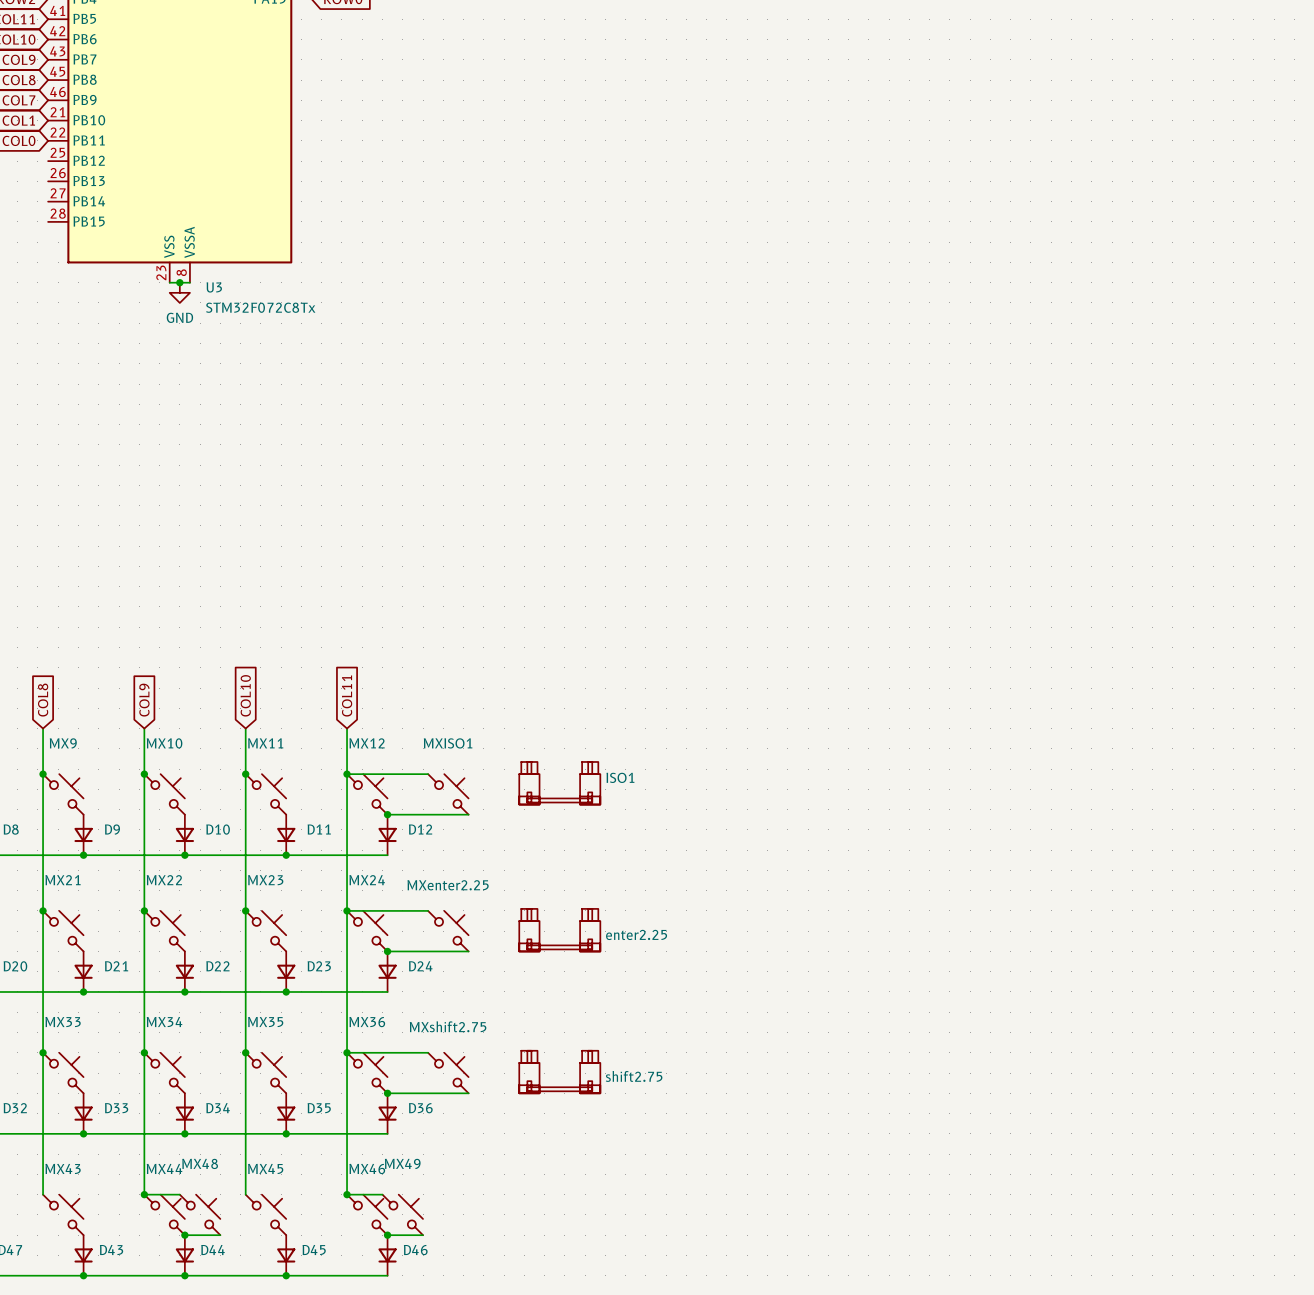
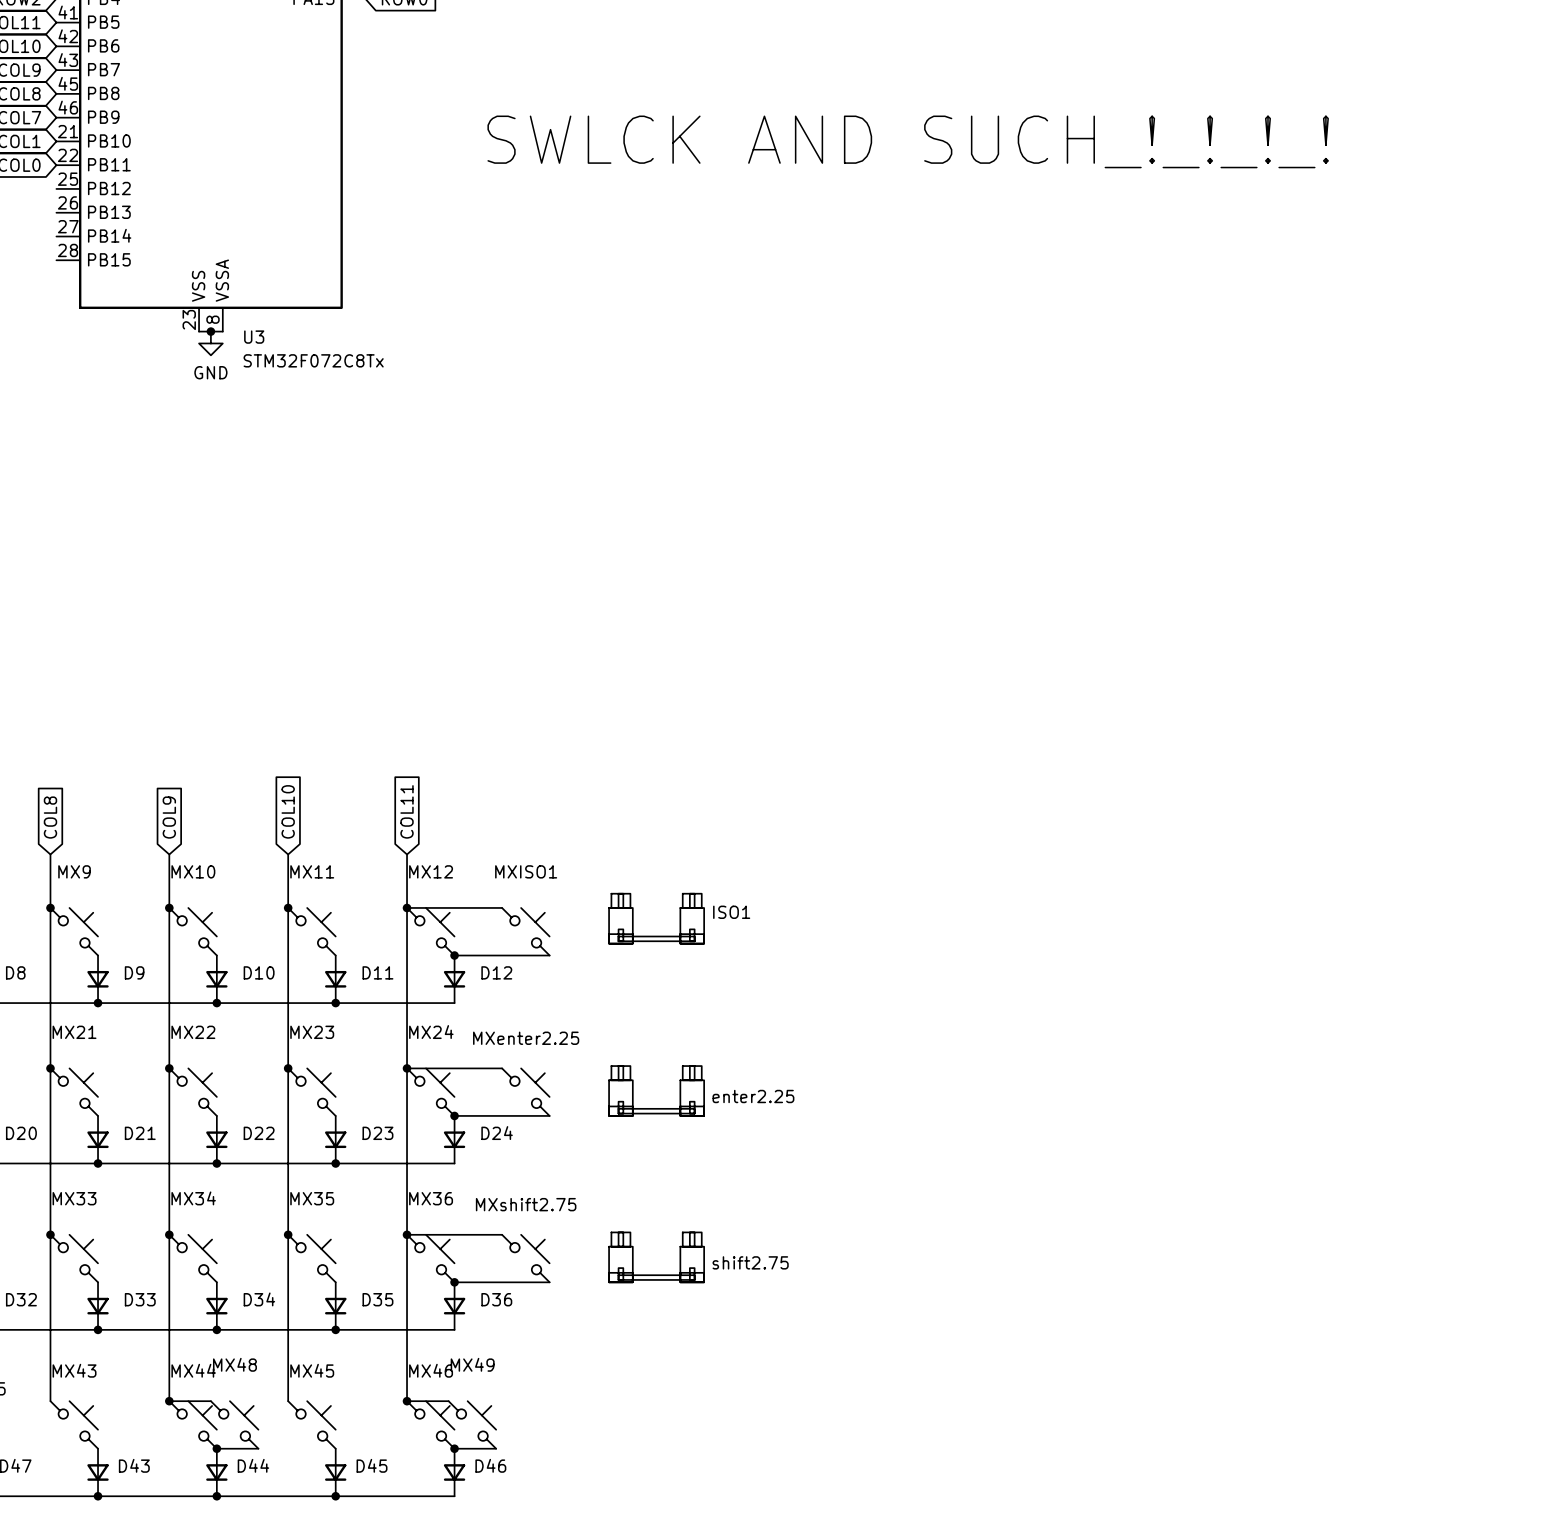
text: none -> SWLCK AND SUCH_!_!_!_! (908, 141)

